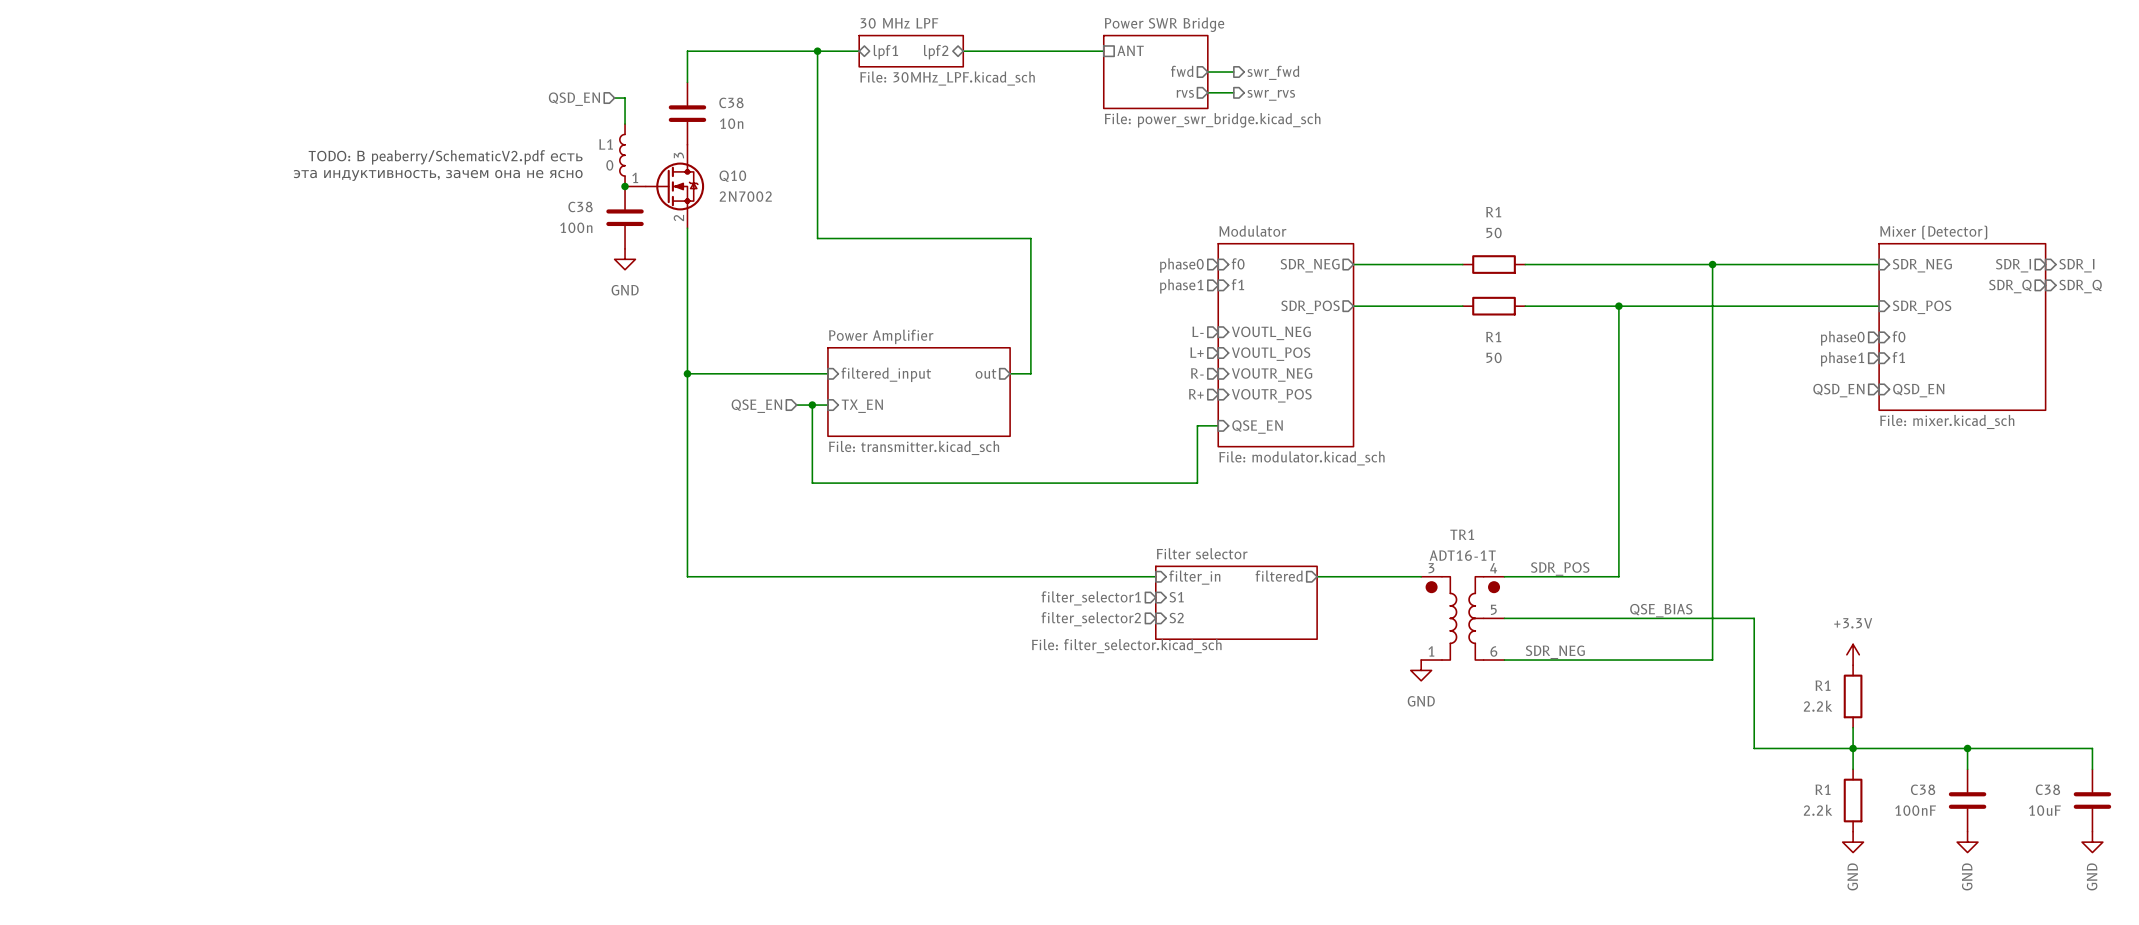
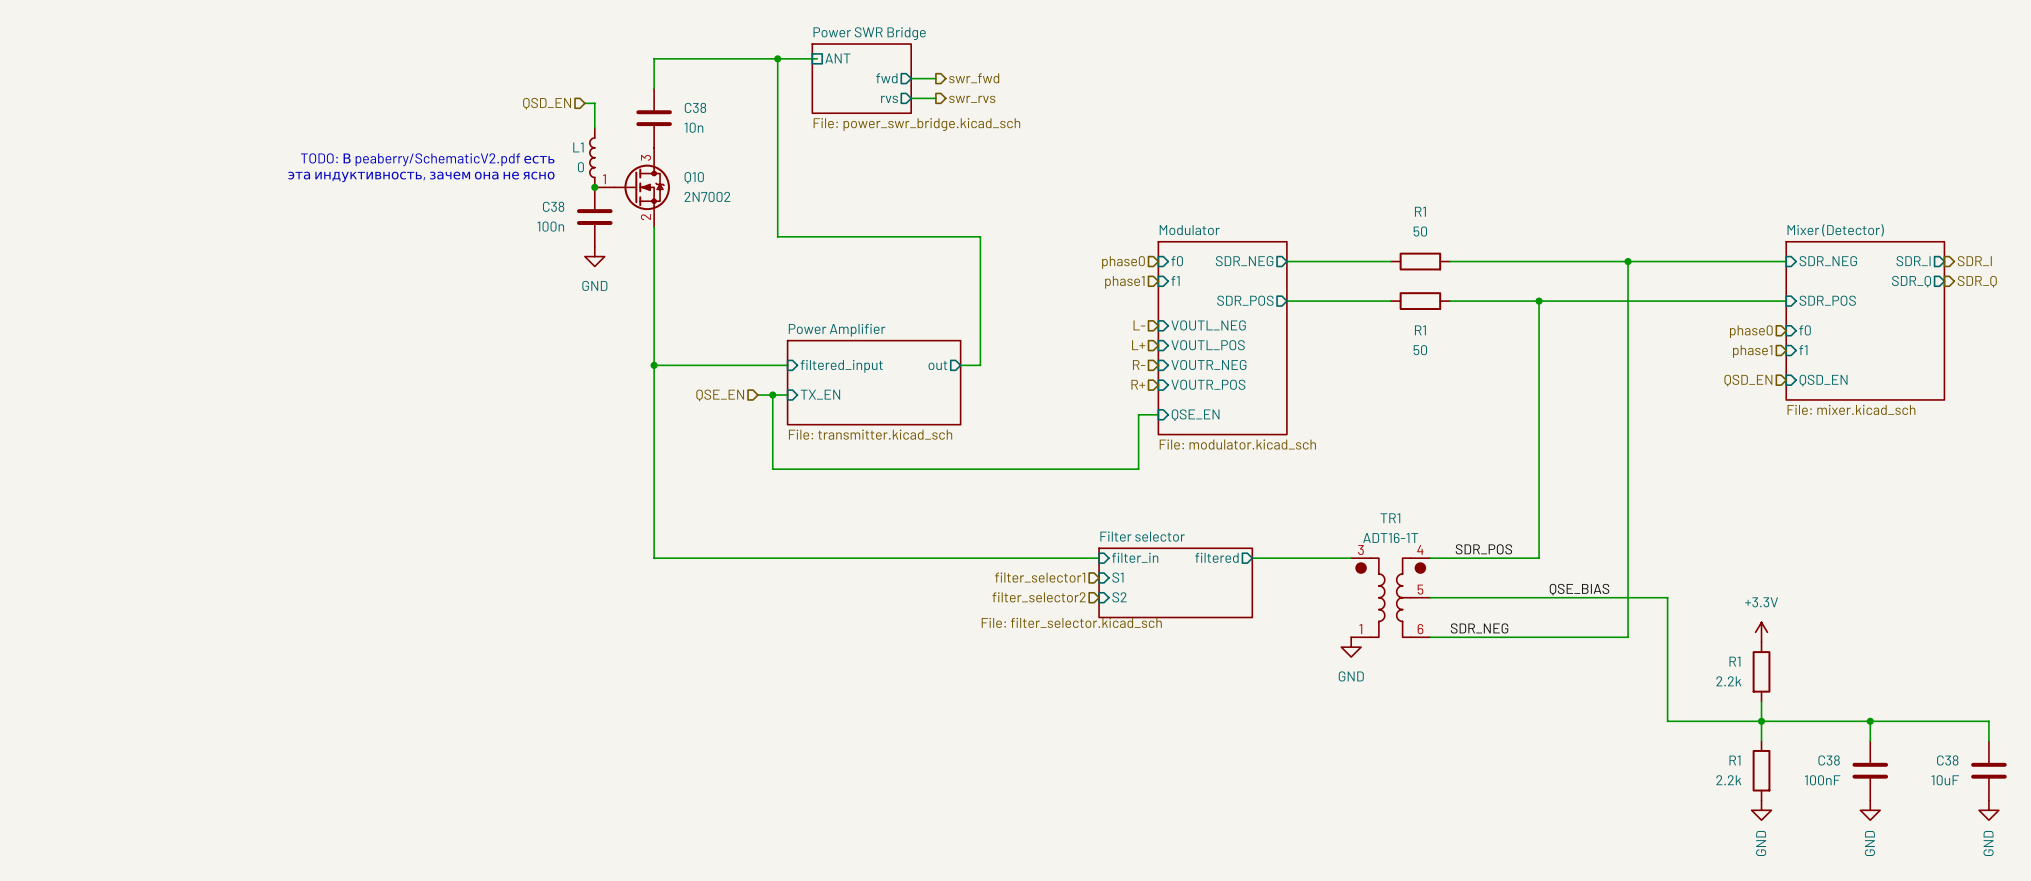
sheet pin: ANT (1130, 50) -> none
sheet 30 MHz LPF: File: 30MHz_LPF.kicad_sch (911, 51) -> none
wire: (963, 51) (1103, 51) -> none
sheet pin shape: bidirectional (885, 52) -> passive (837, 58)
sheet pin: lpf1 (885, 52) -> ANT (837, 58)
sheet pin: lpf2 (936, 52) -> none
sheet pin: none -> fwd (886, 78)
sheet pin: fwd (1182, 71) -> none
sheet Power SWR Bridge: none -> File: power_swr_bridge.kicad_sch (861, 78)
wire: none -> (911, 78) (935, 78)
hierarchical label: none -> swr_fwd (974, 78)
sheet Power SWR Bridge: File: power_swr_bridge.kicad_sch (1155, 72) -> none
wire: (1207, 72) (1233, 72) -> none
hierarchical label: swr_fwd (1273, 72) -> none
wire: none -> (911, 98) (935, 98)
wire: (1207, 92) (1233, 92) -> none
sheet pin: none -> rvs (889, 99)
sheet pin: rvs (1185, 93) -> none
hierarchical label: none -> swr_rvs (972, 99)
hierarchical label: swr_rvs (1271, 95) -> none

